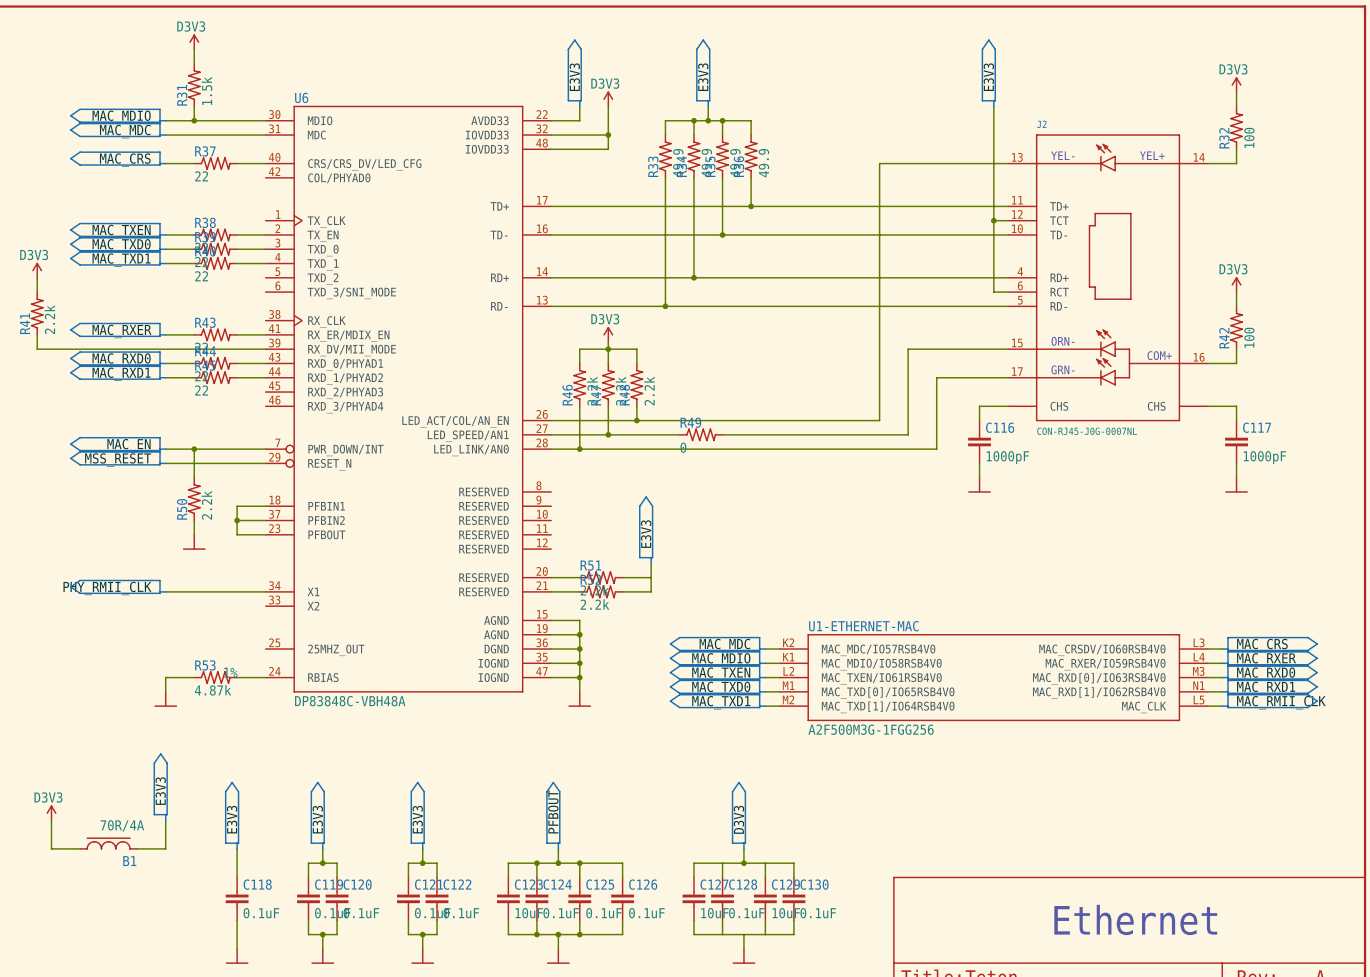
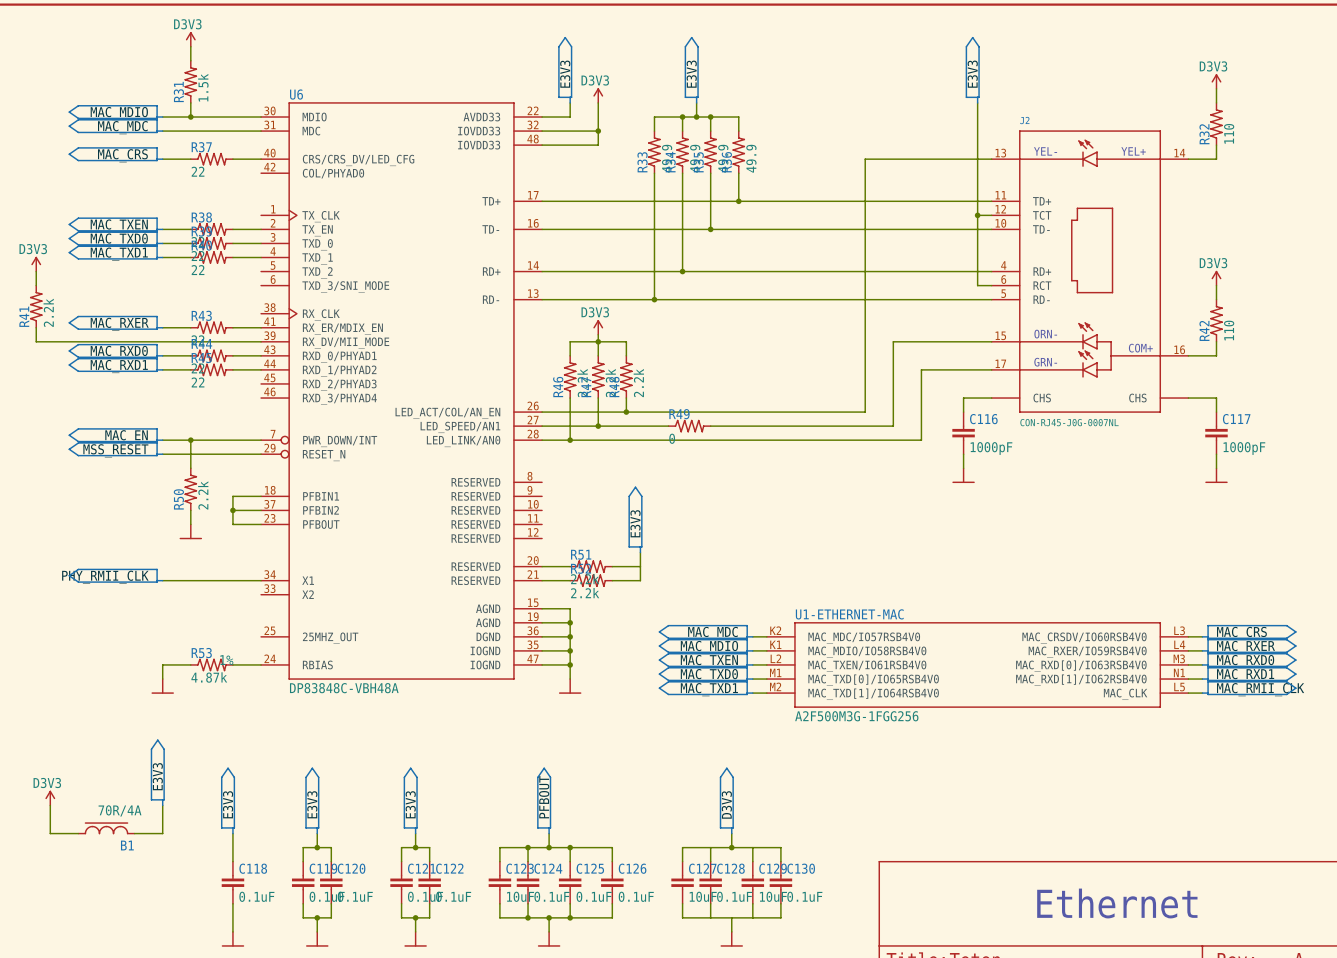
R32 value: 100 (1249, 137) -> 110 (1229, 133)
R42 value: 100 (1249, 337) -> 110 (1229, 330)

